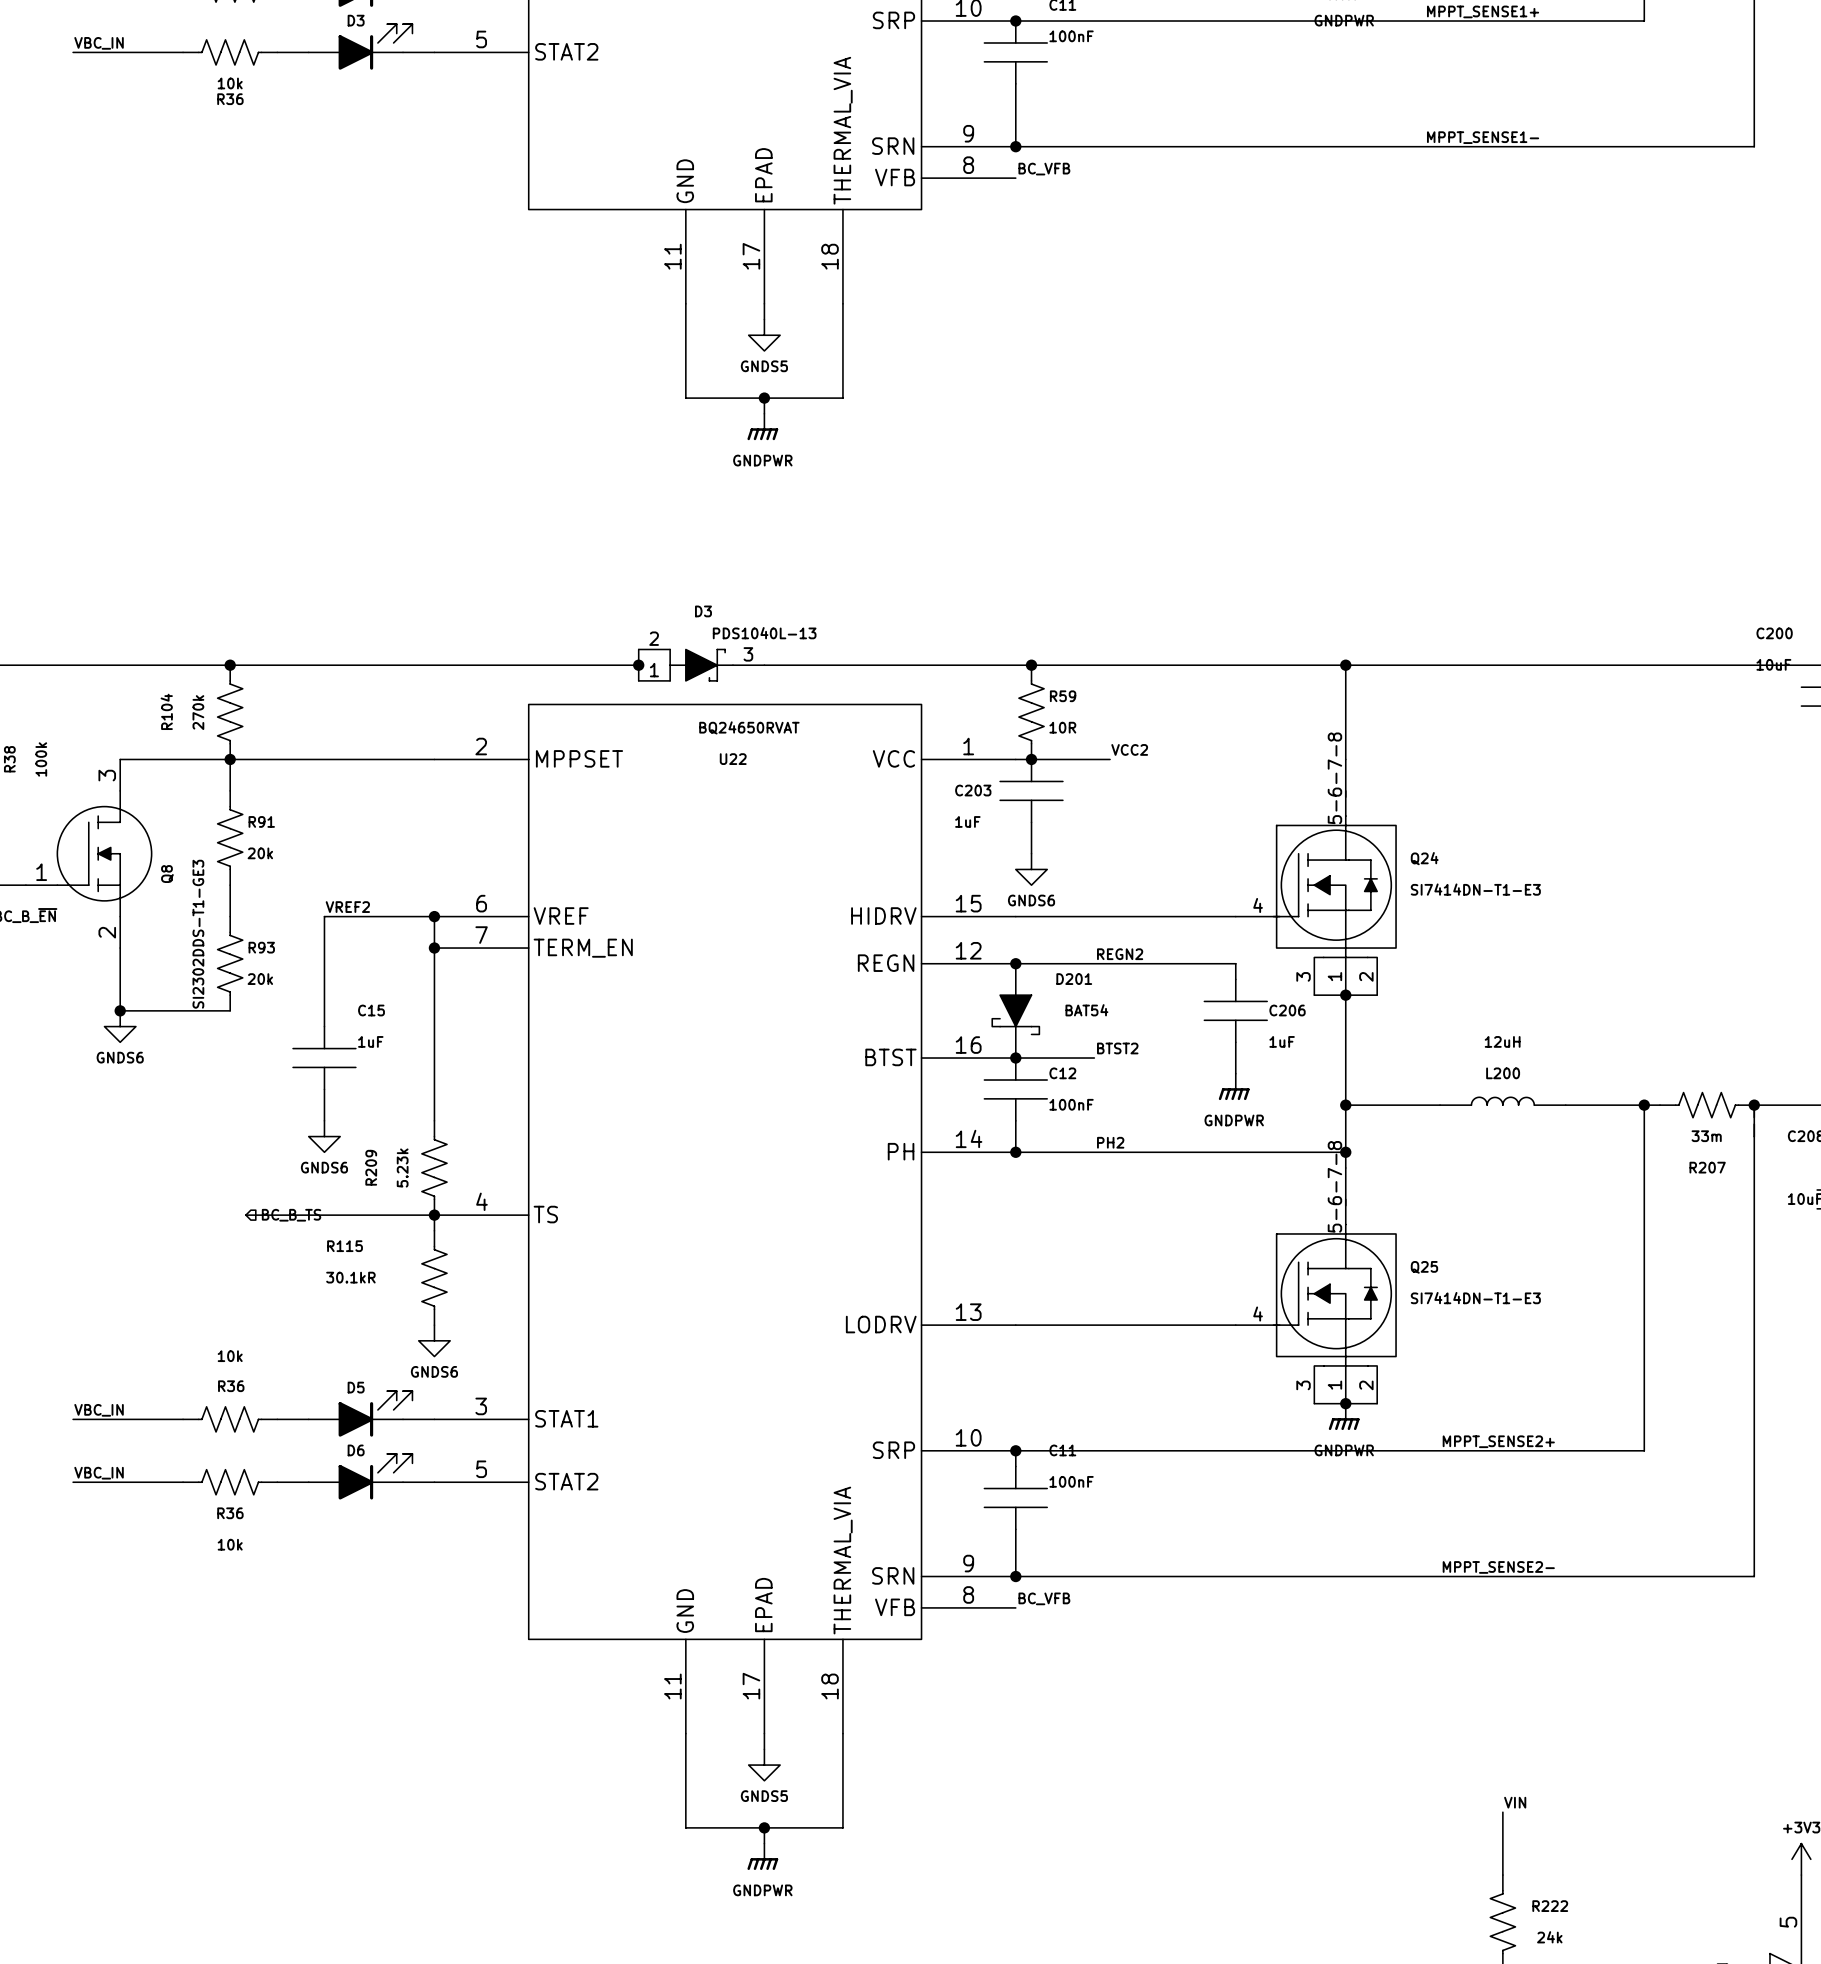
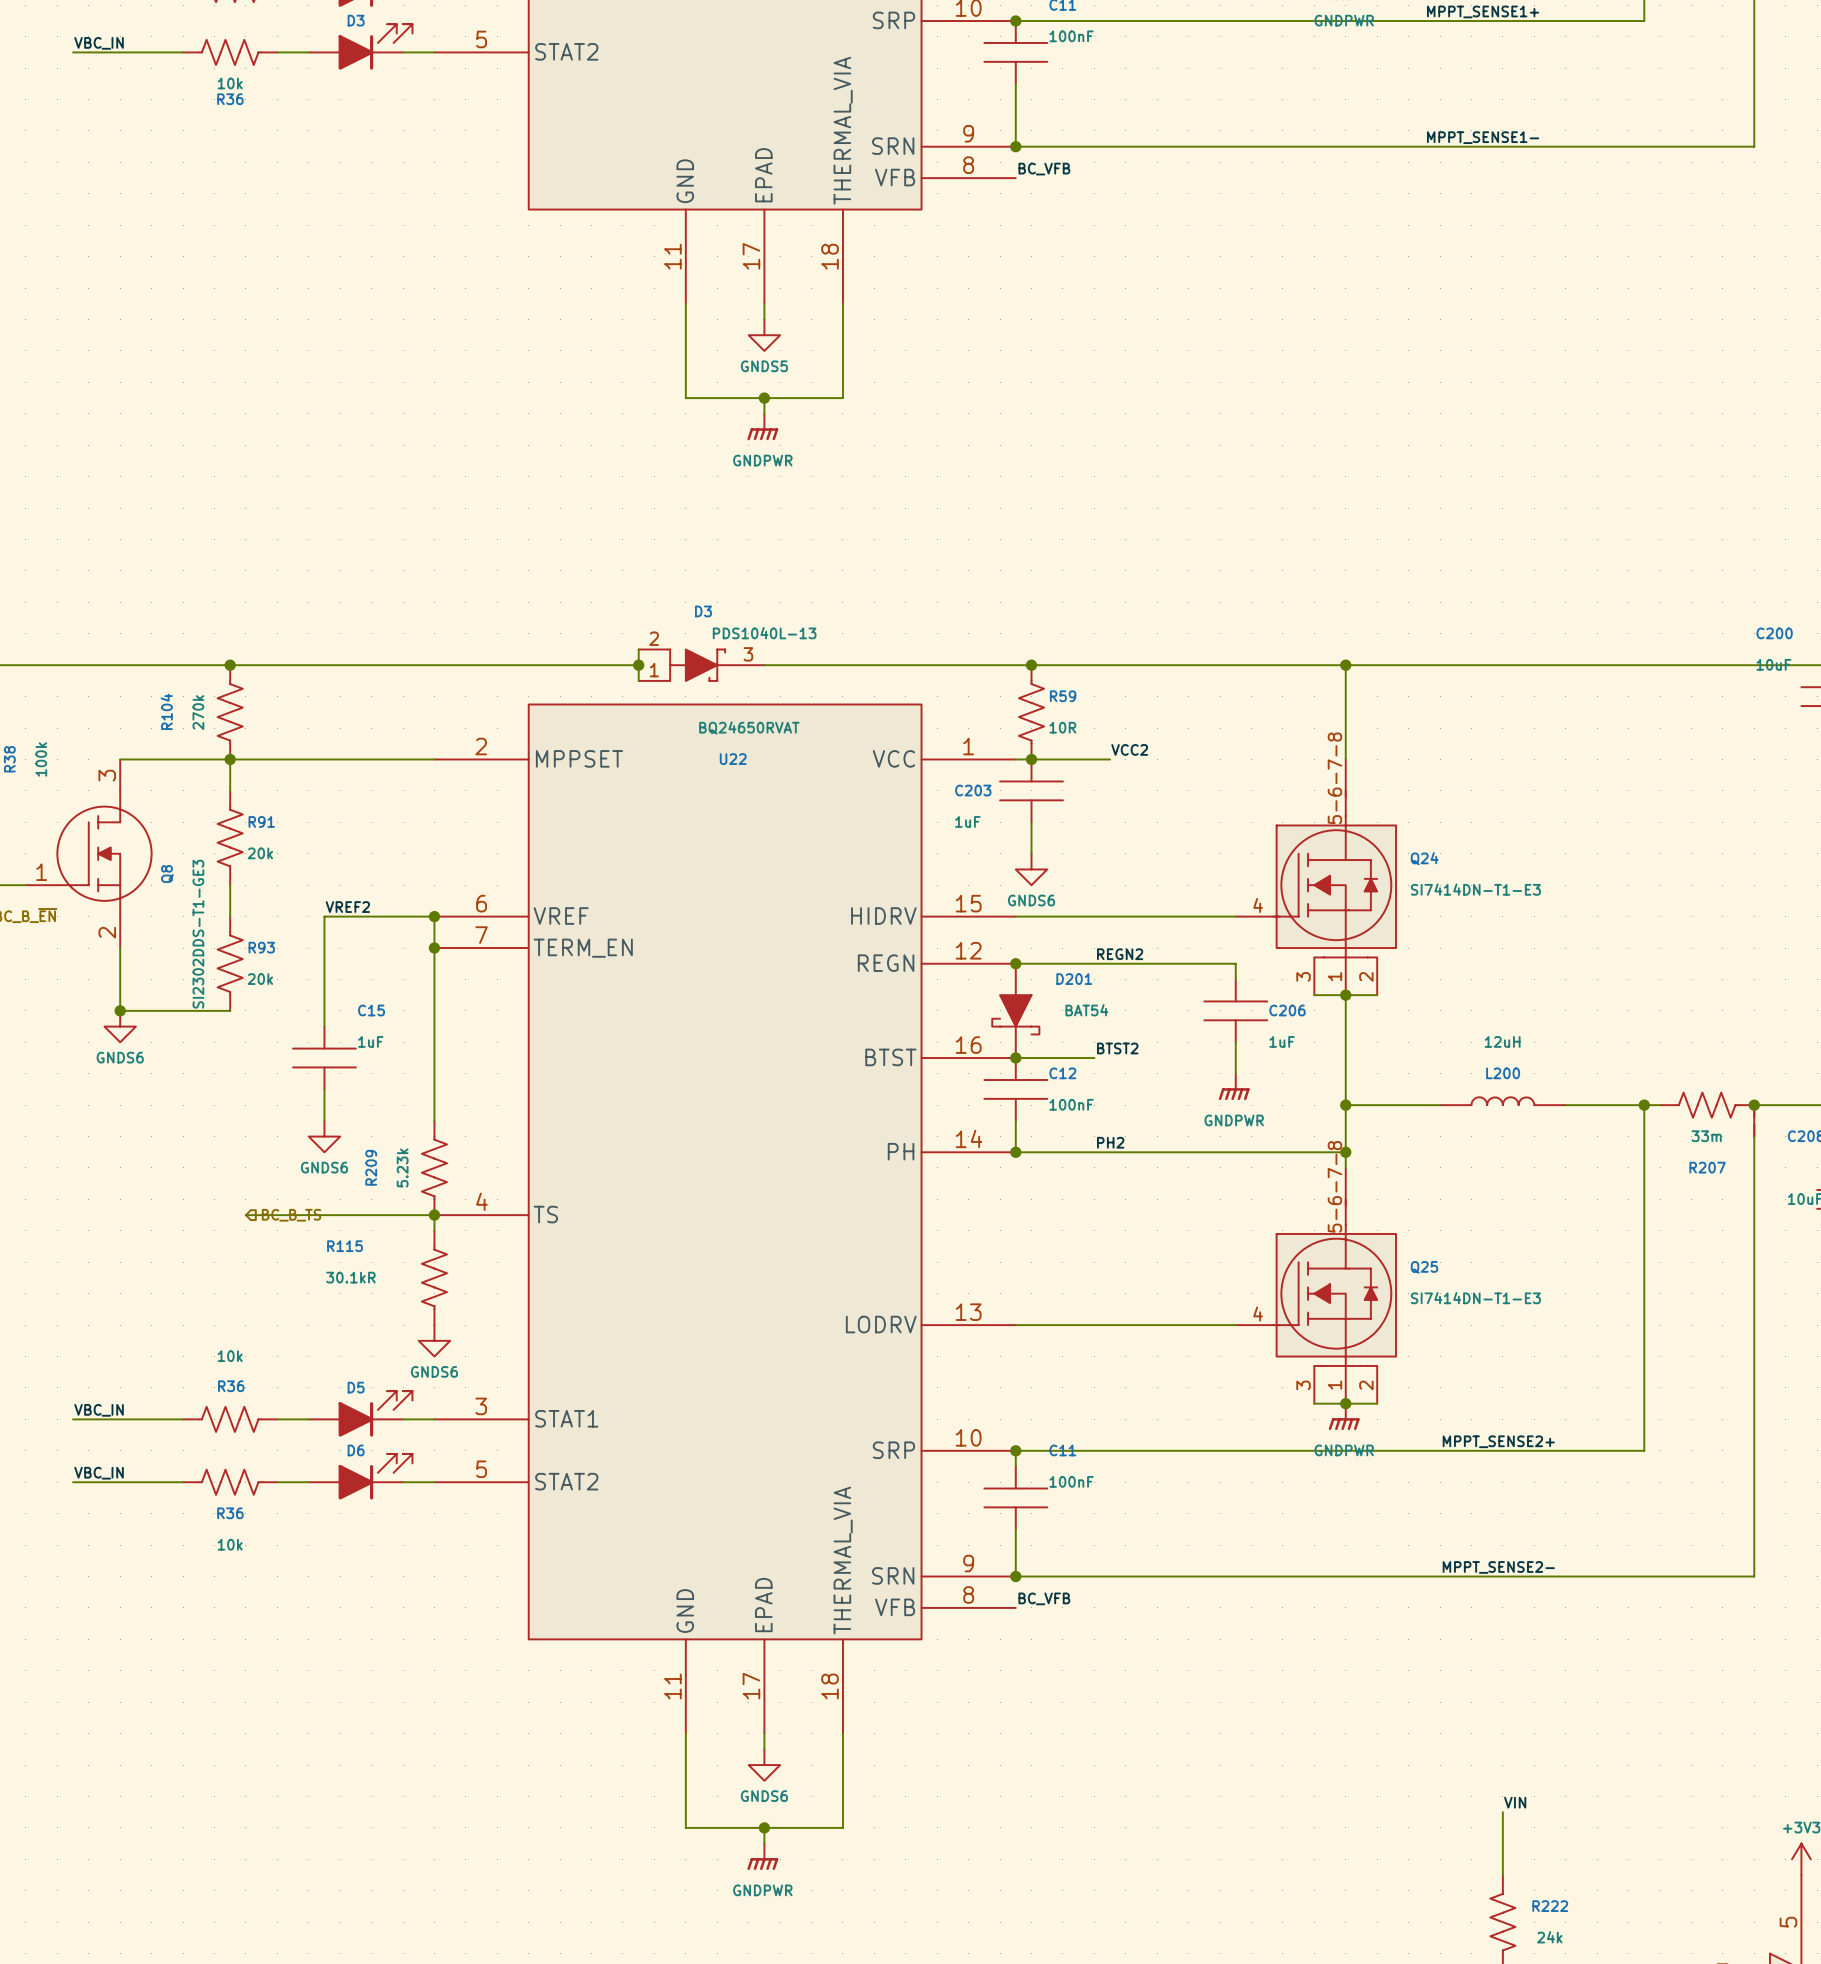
power symbol: GNDS5 (764, 1765) -> GNDS6 (764, 1765)

